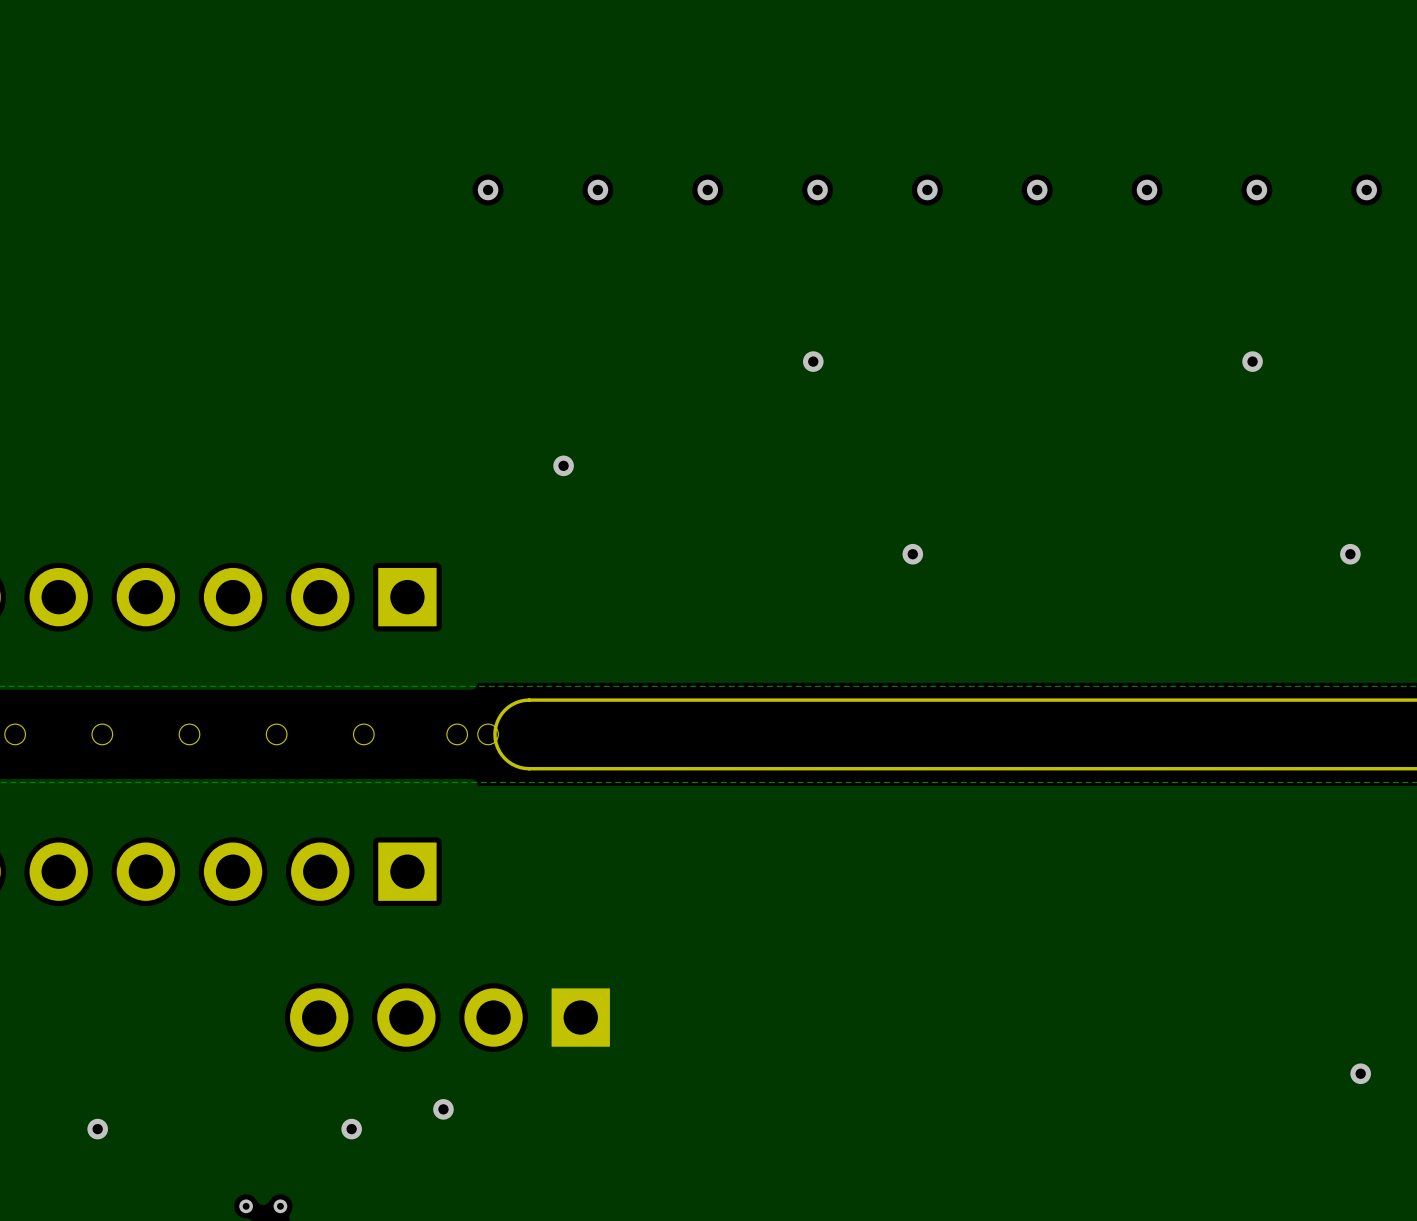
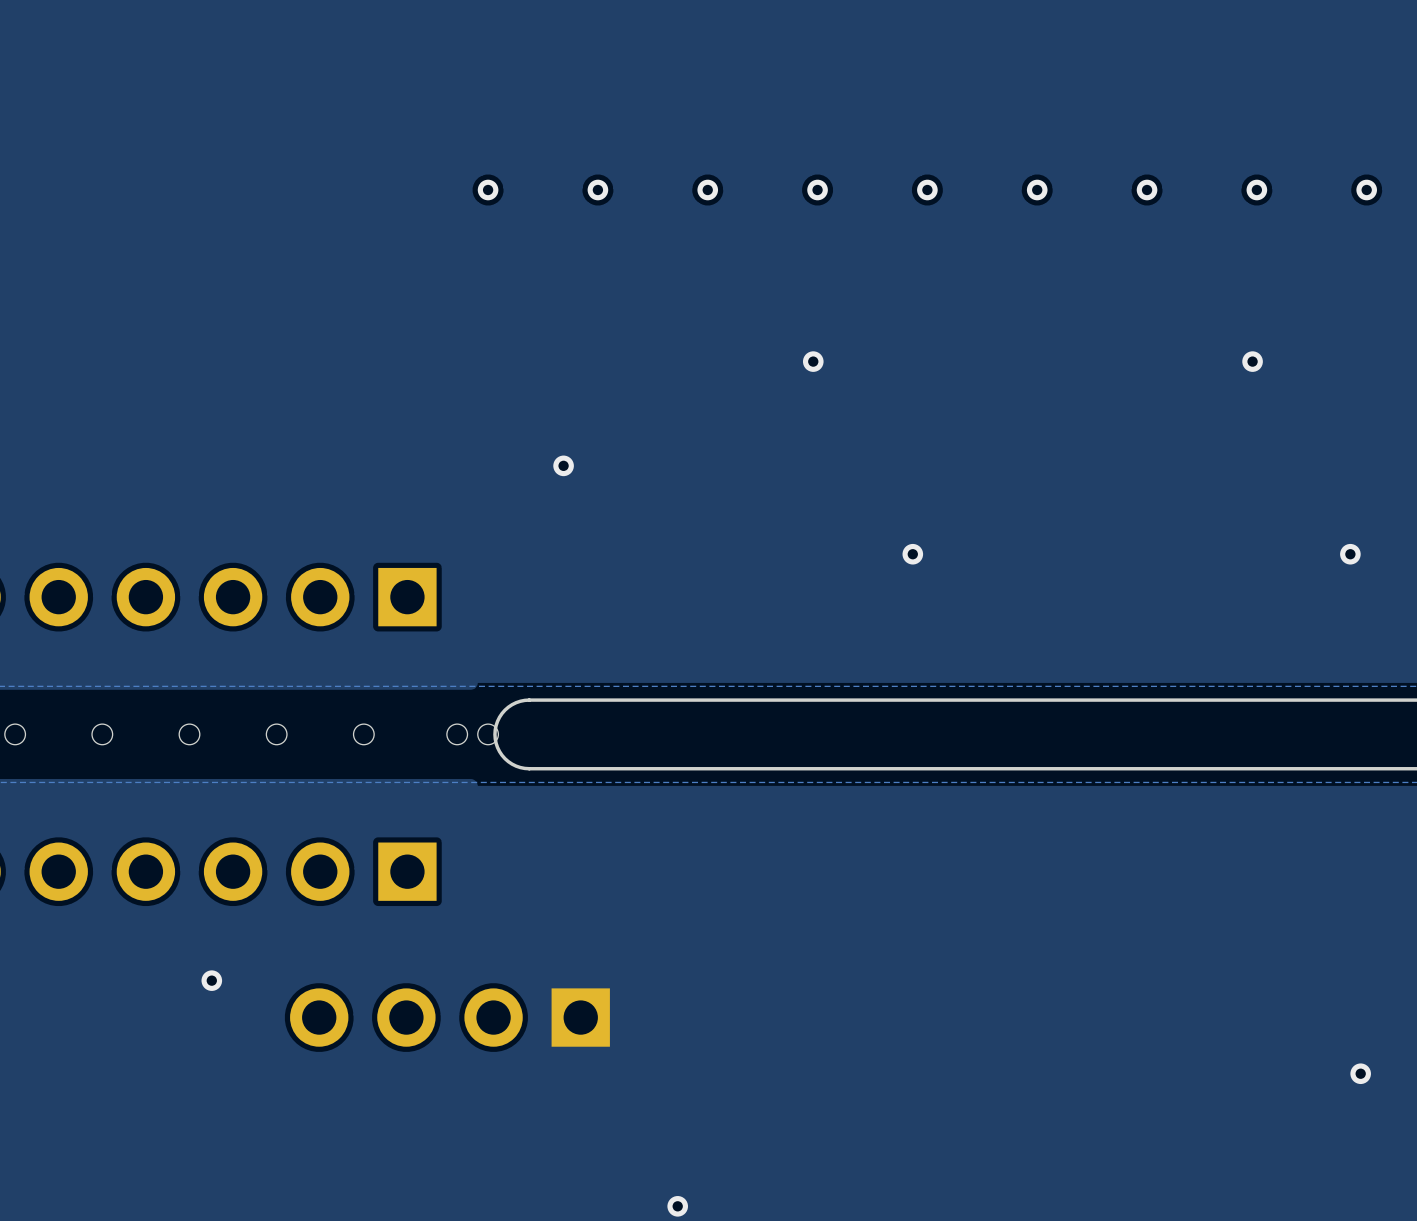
via: none -> (211, 980)
via: (443, 1109) -> none
via: (97, 1129) -> none
via: (351, 1129) -> none
via: (246, 1206) -> none
via: (280, 1206) -> none
via: none -> (677, 1206)

